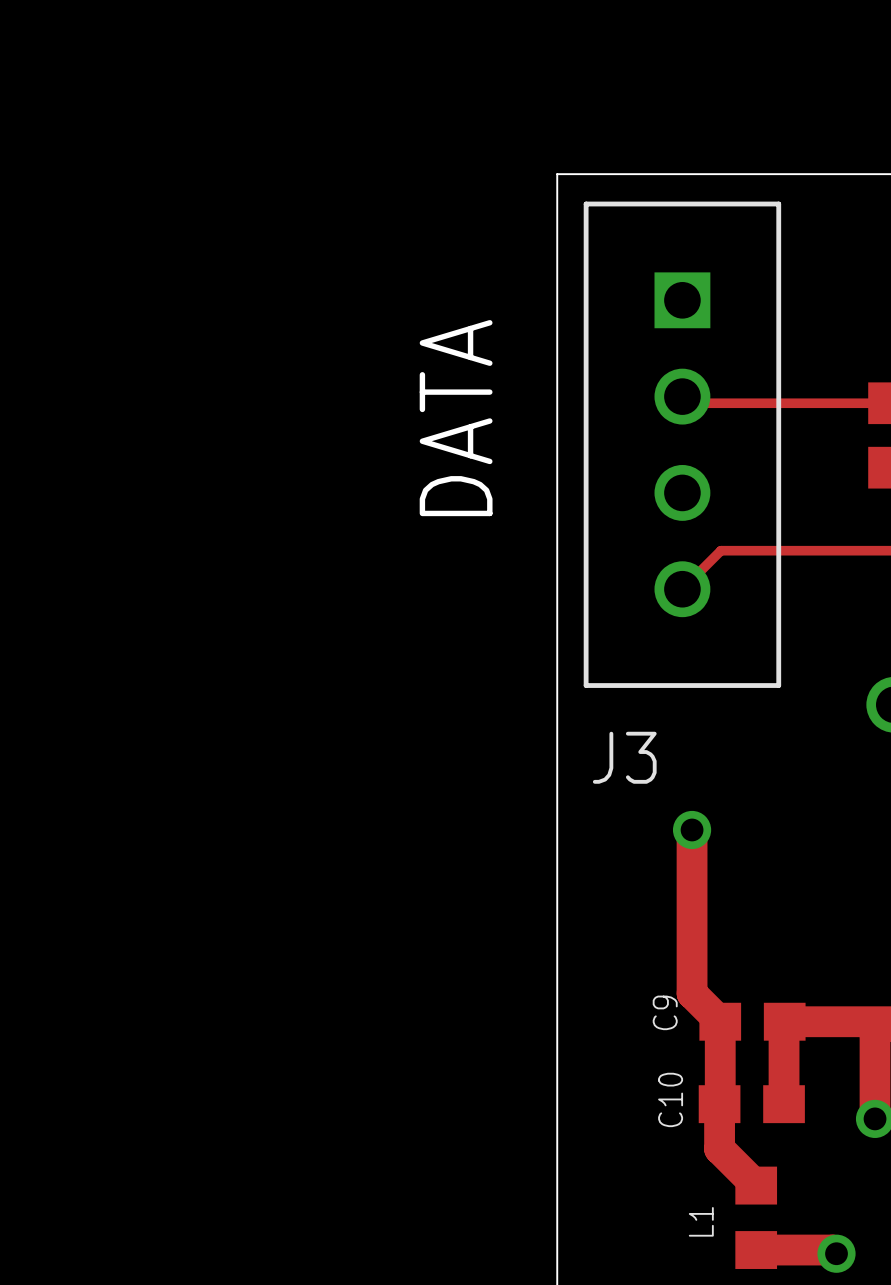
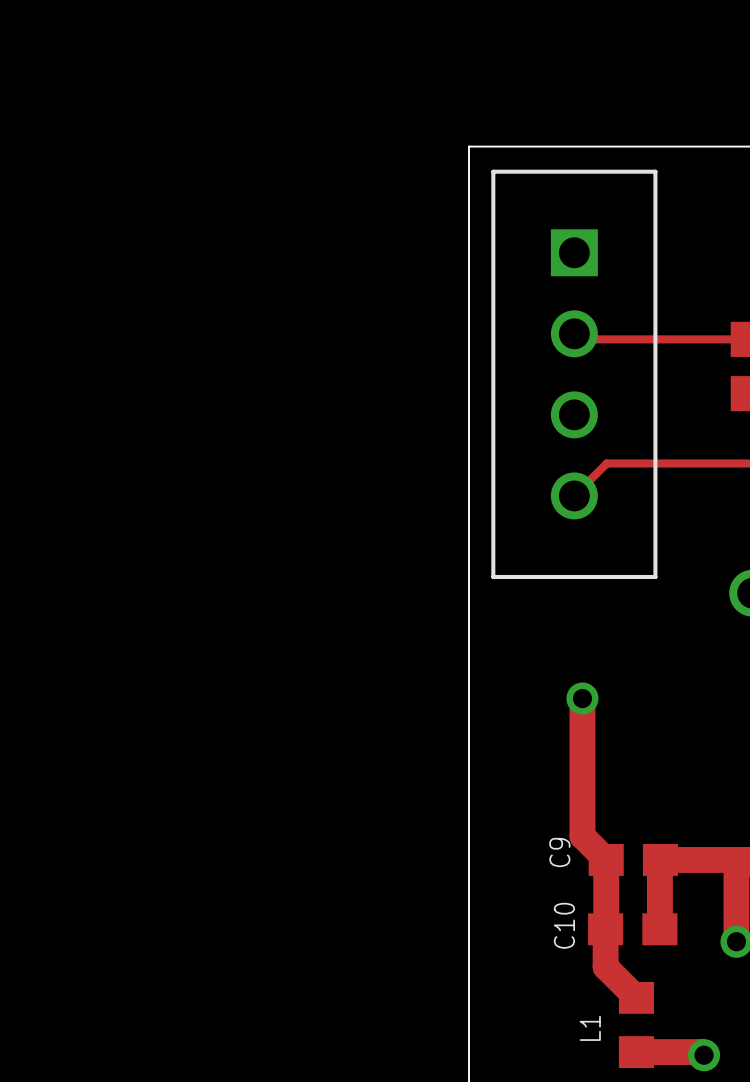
text: DATA (456, 418) -> none
J3 name: J3 (624, 757) -> none

